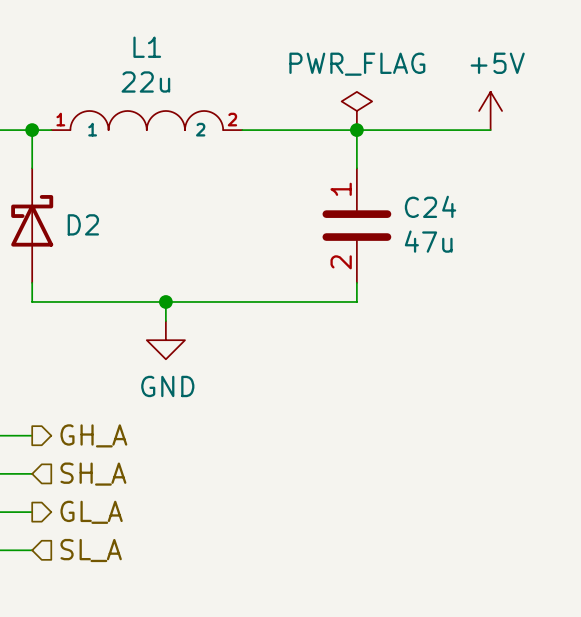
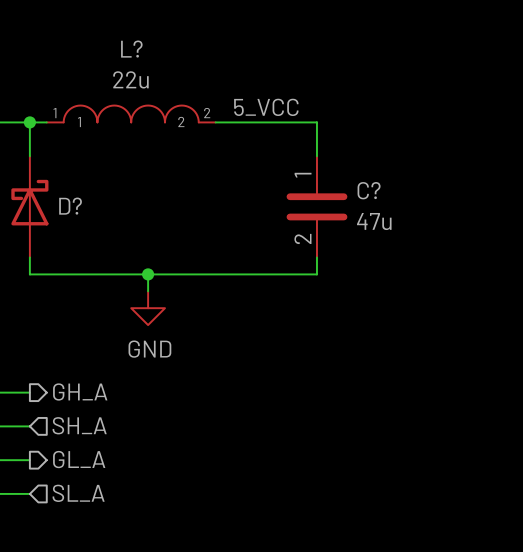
L1 name: L1 (147, 47) -> L? (131, 49)
power symbol: PWR_FLAG (356, 110) -> none
power symbol: +5V (490, 110) -> none
label: none -> 5_VCC (266, 107)
wire: (356, 130) (490, 130) -> none
junction: (356, 130) -> none
C24 name: C24 (430, 206) -> C? (369, 190)
D2 name: D2 (83, 224) -> D? (70, 206)

